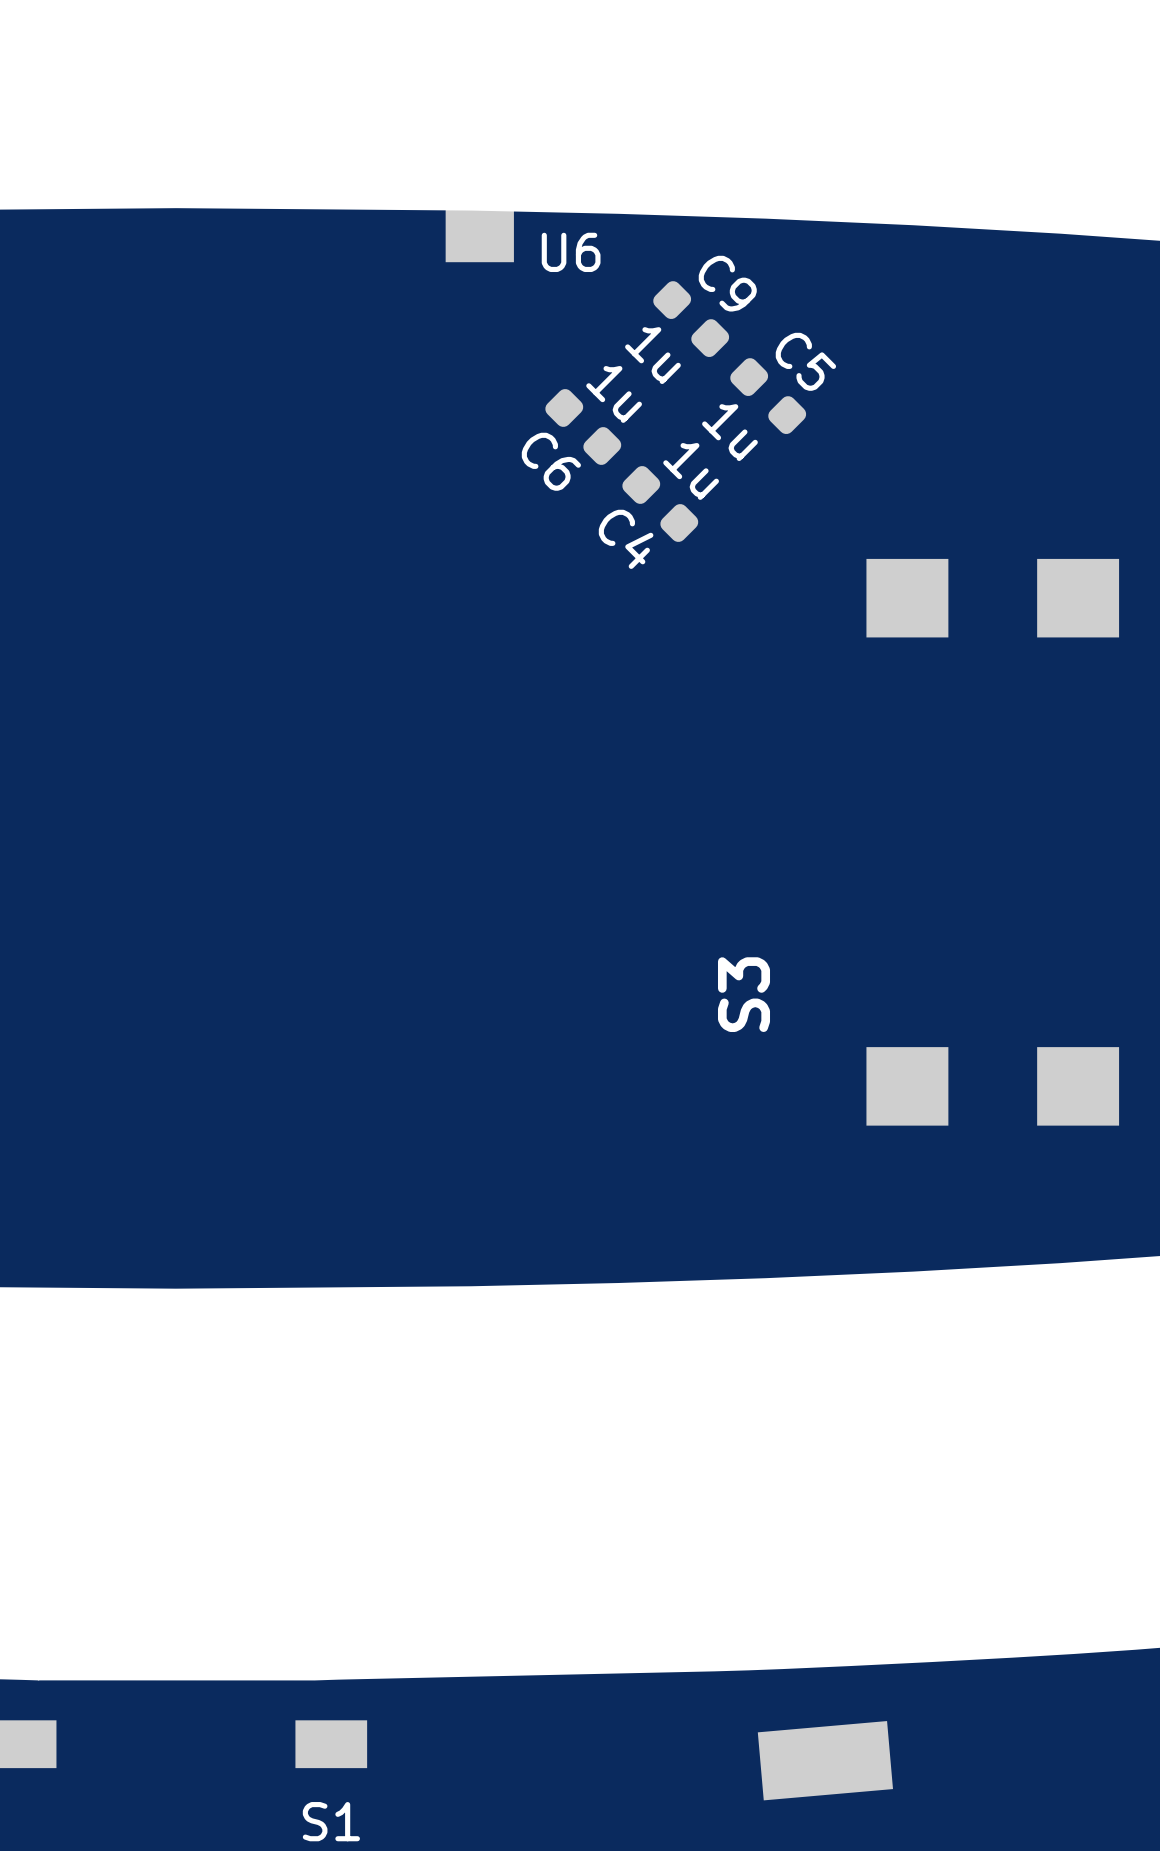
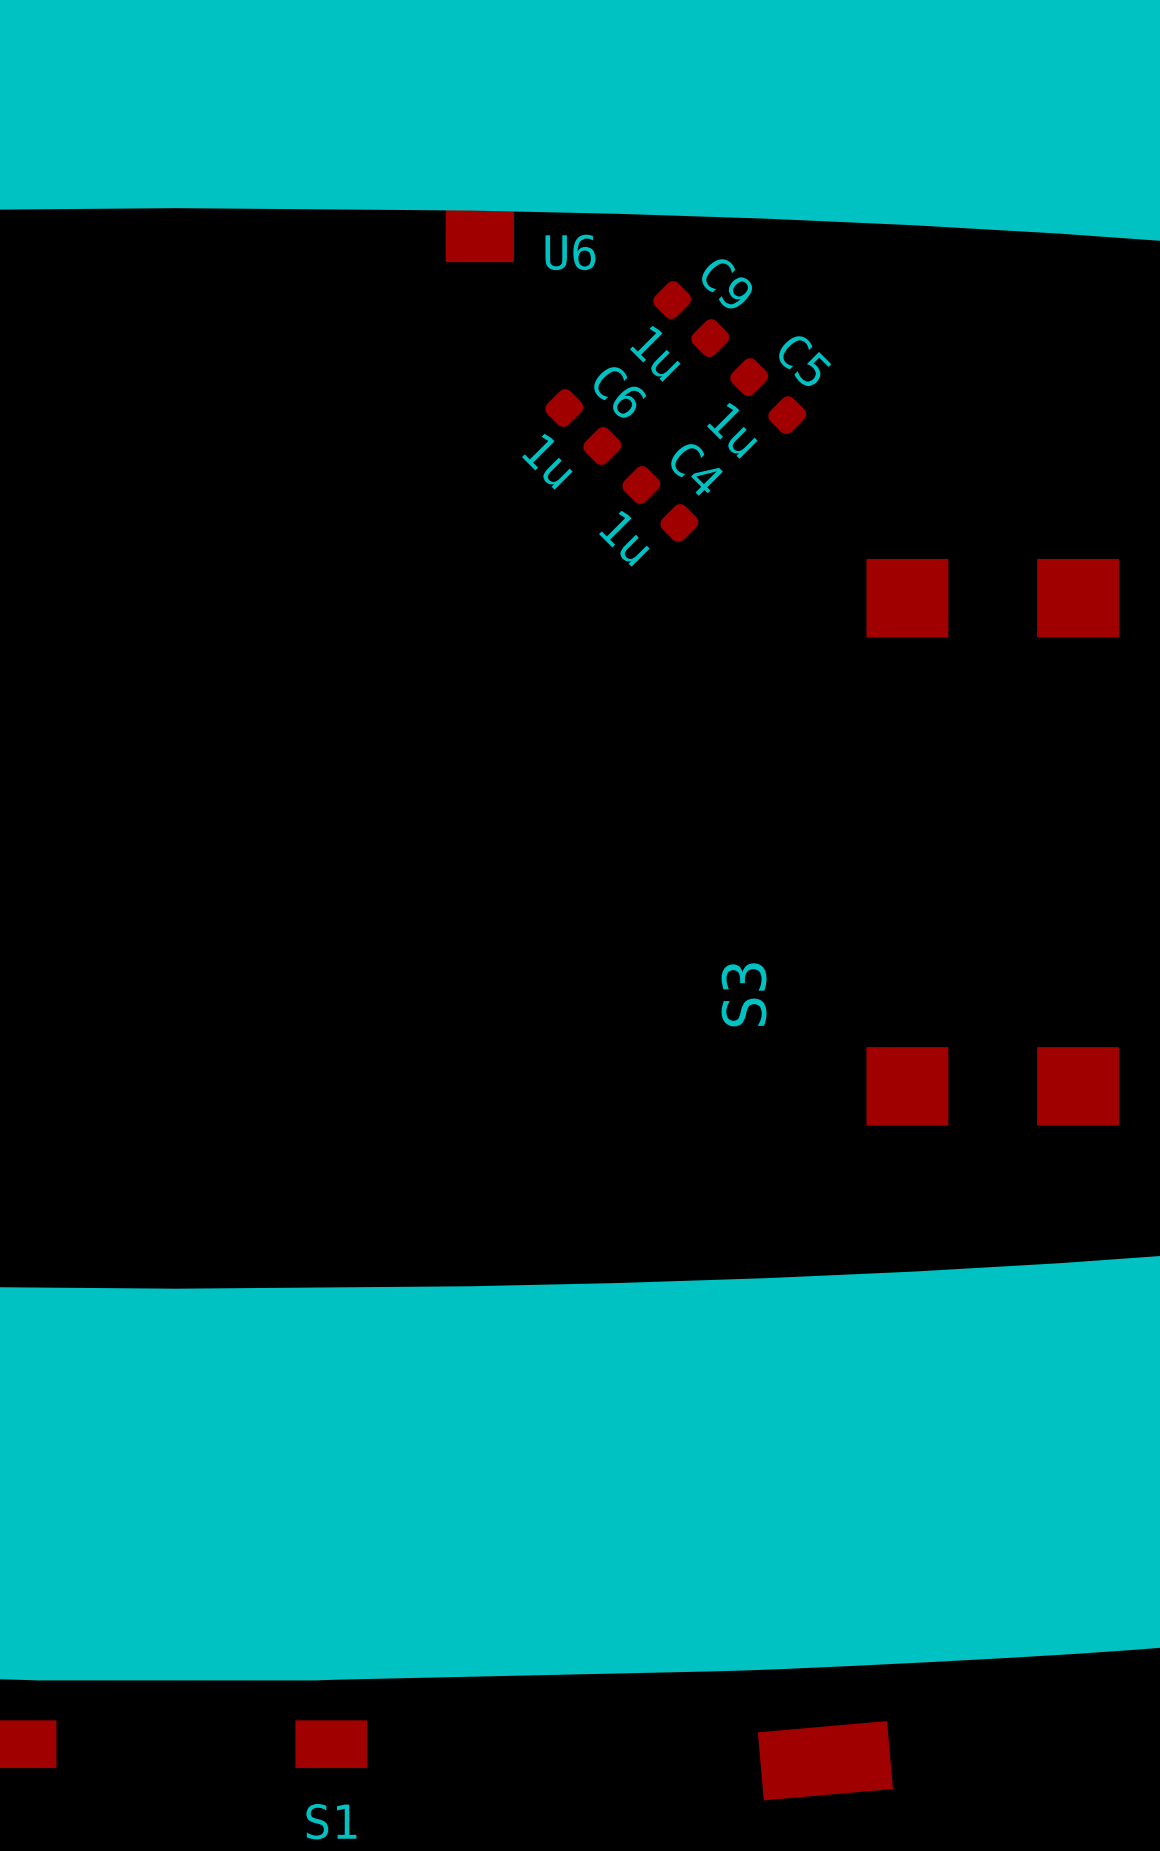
C6 value position: 1u (614, 394) -> 1u (547, 461)
C6 name position: C6 (551, 461) -> C6 (619, 392)
C4 value position: 1u (691, 471) -> 1u (624, 538)
C4 name position: C4 (626, 539) -> C4 (696, 469)

